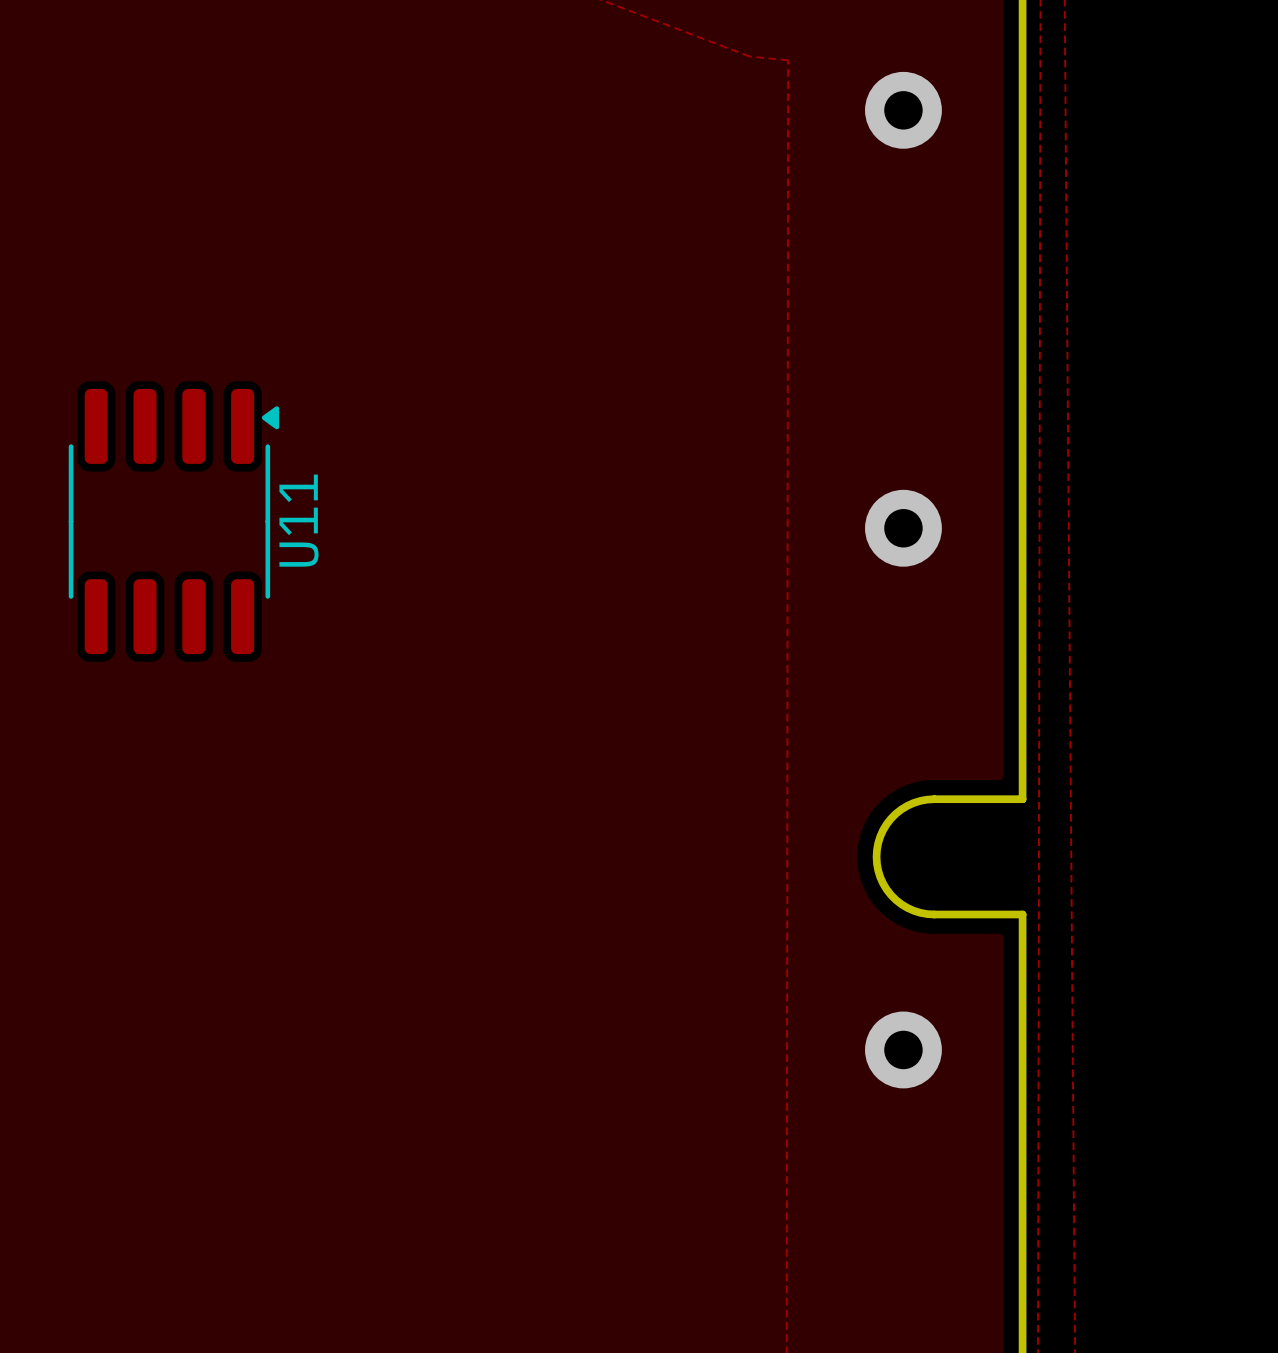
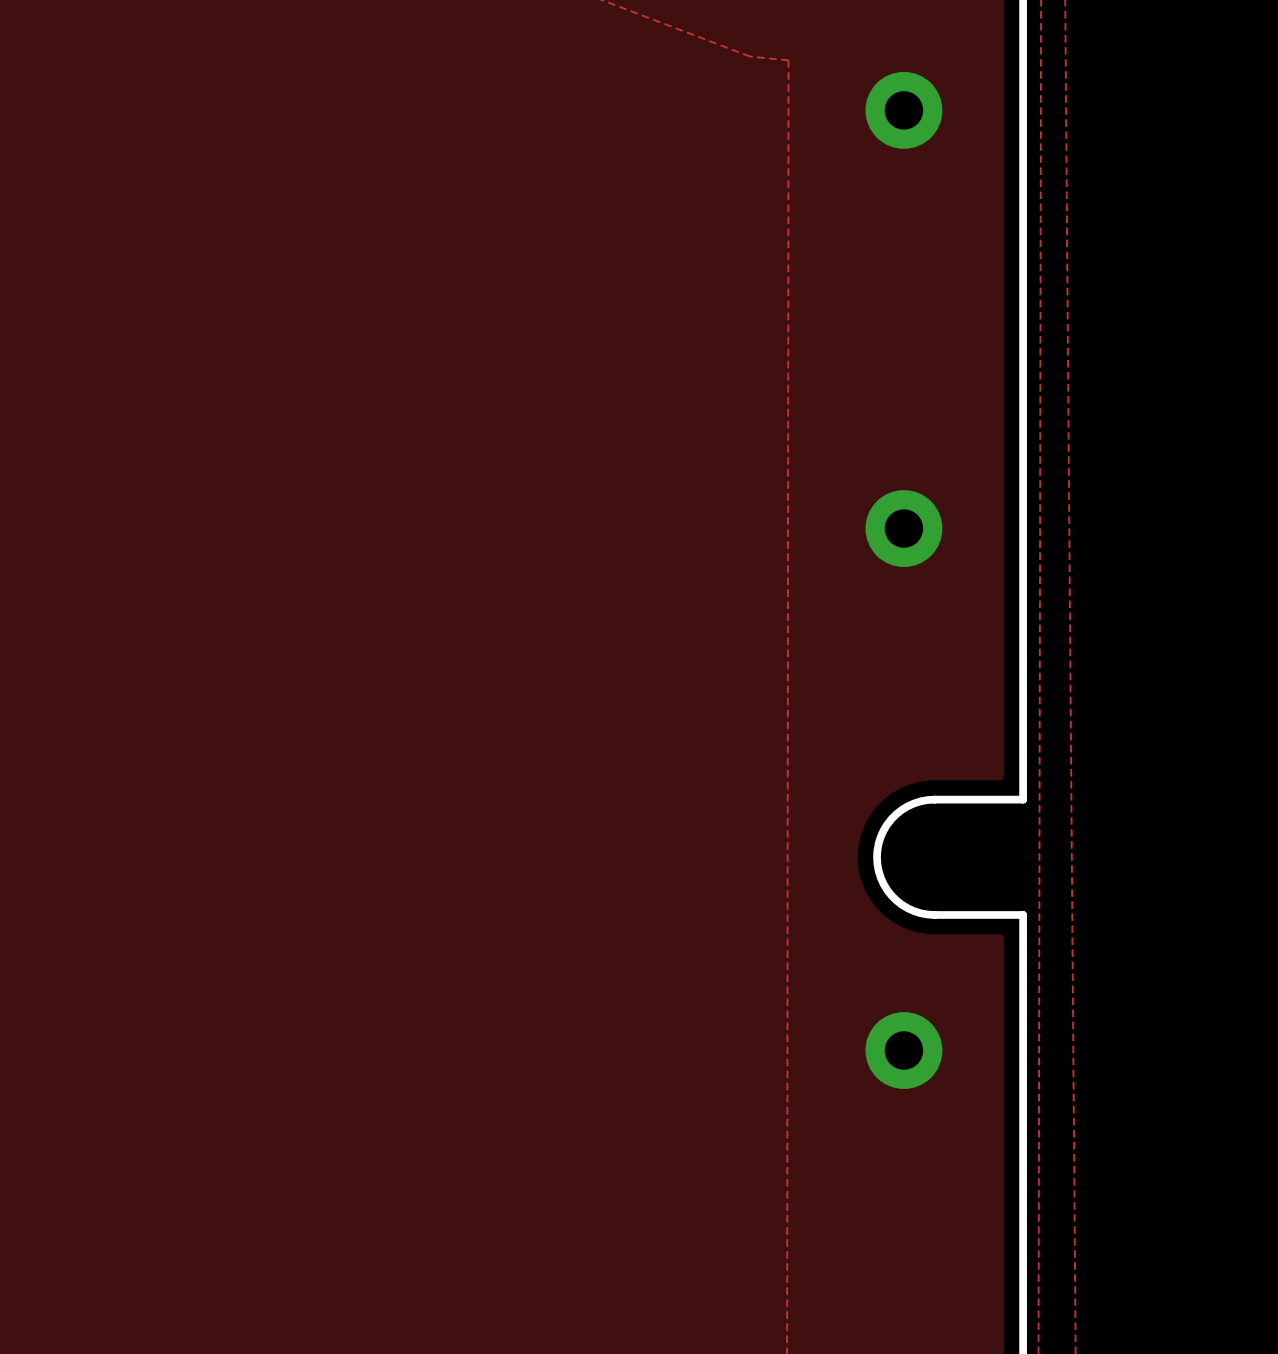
U11: (173, 521) -> none

